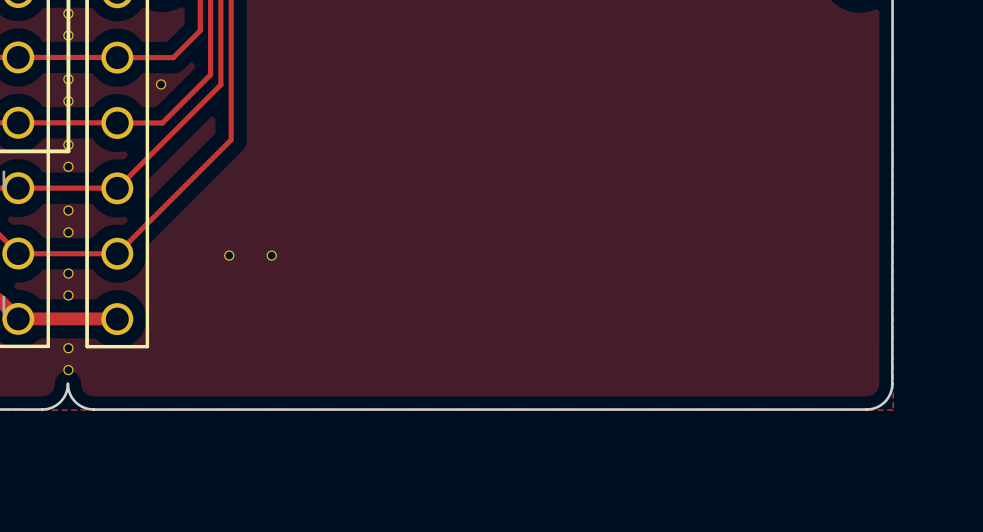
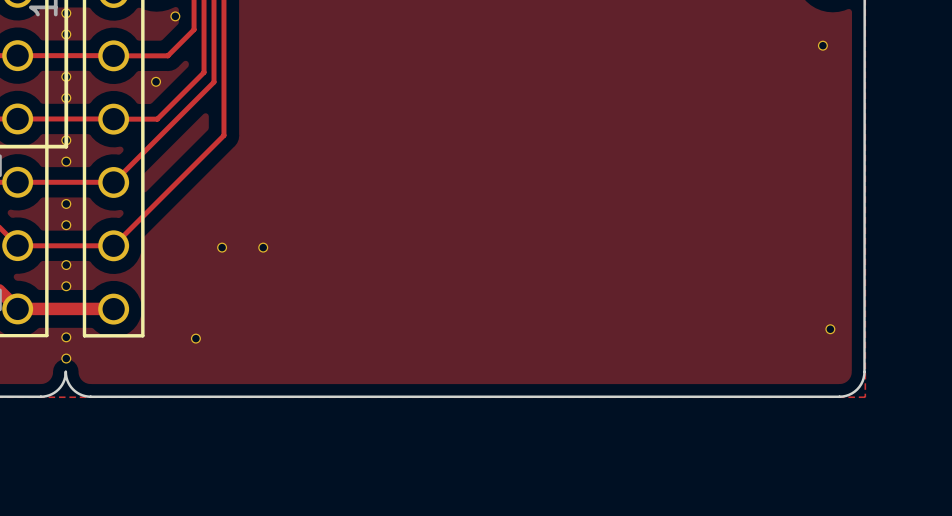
part: none -> (175, 16)
part: none -> (822, 45)
part: none -> (830, 329)
part: none -> (195, 338)

